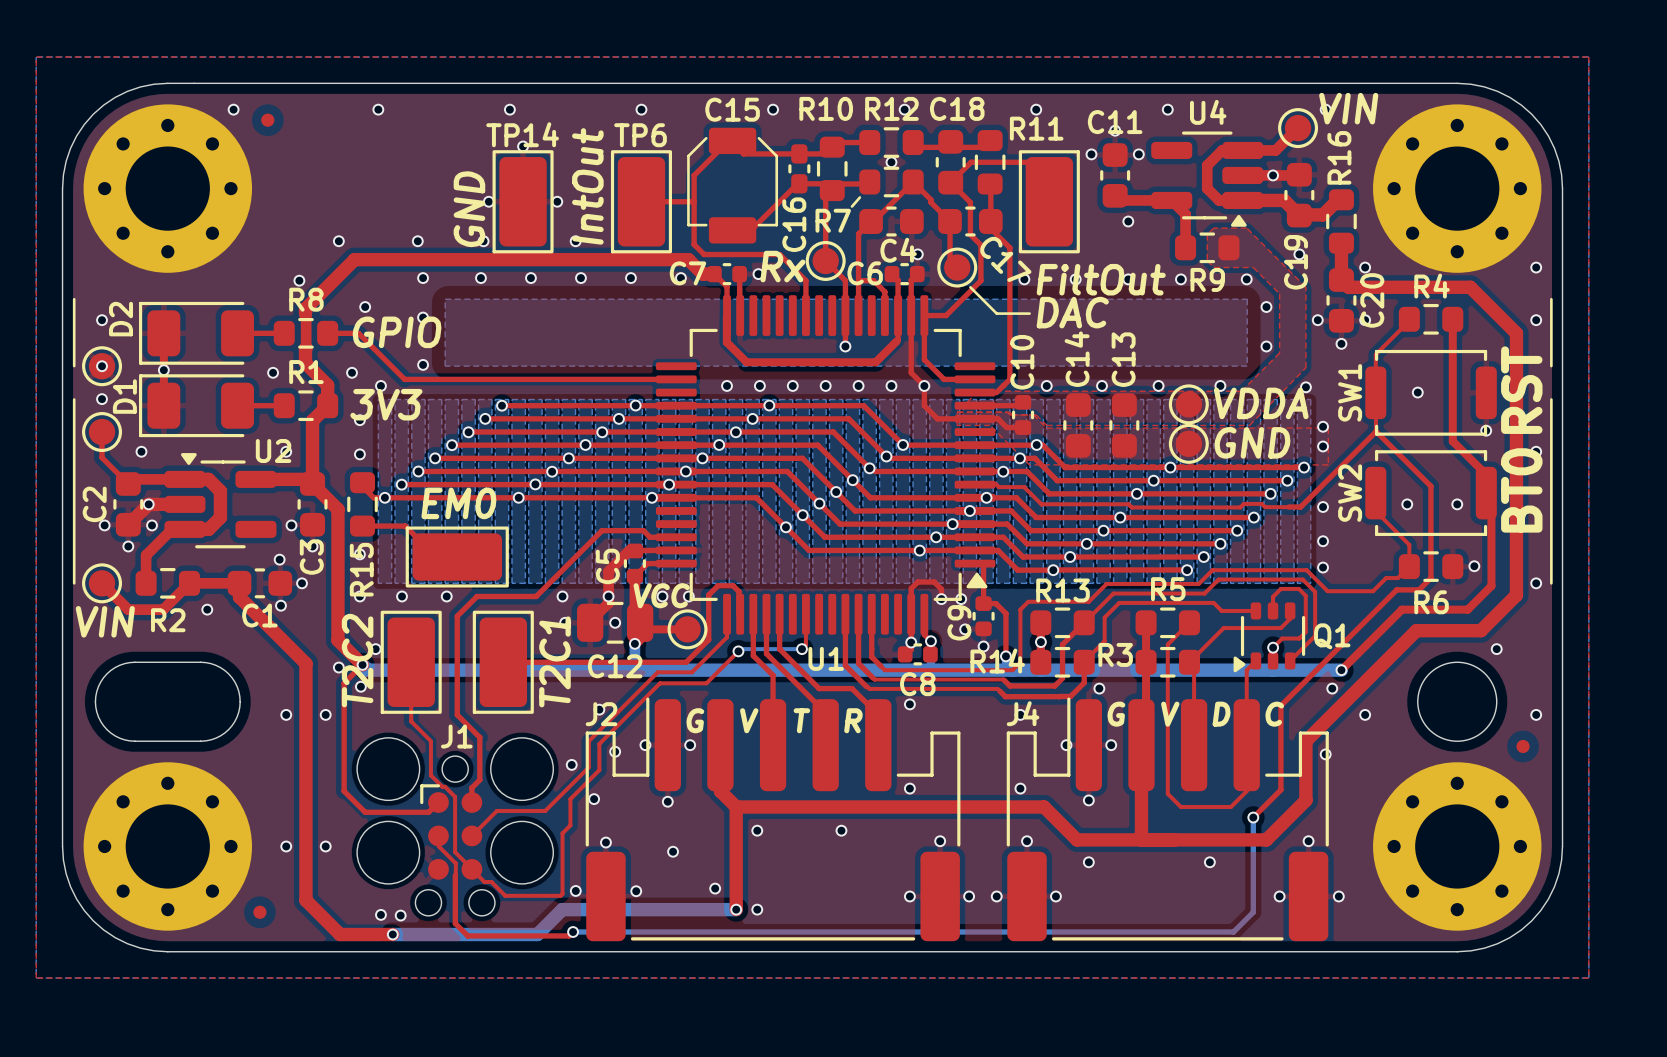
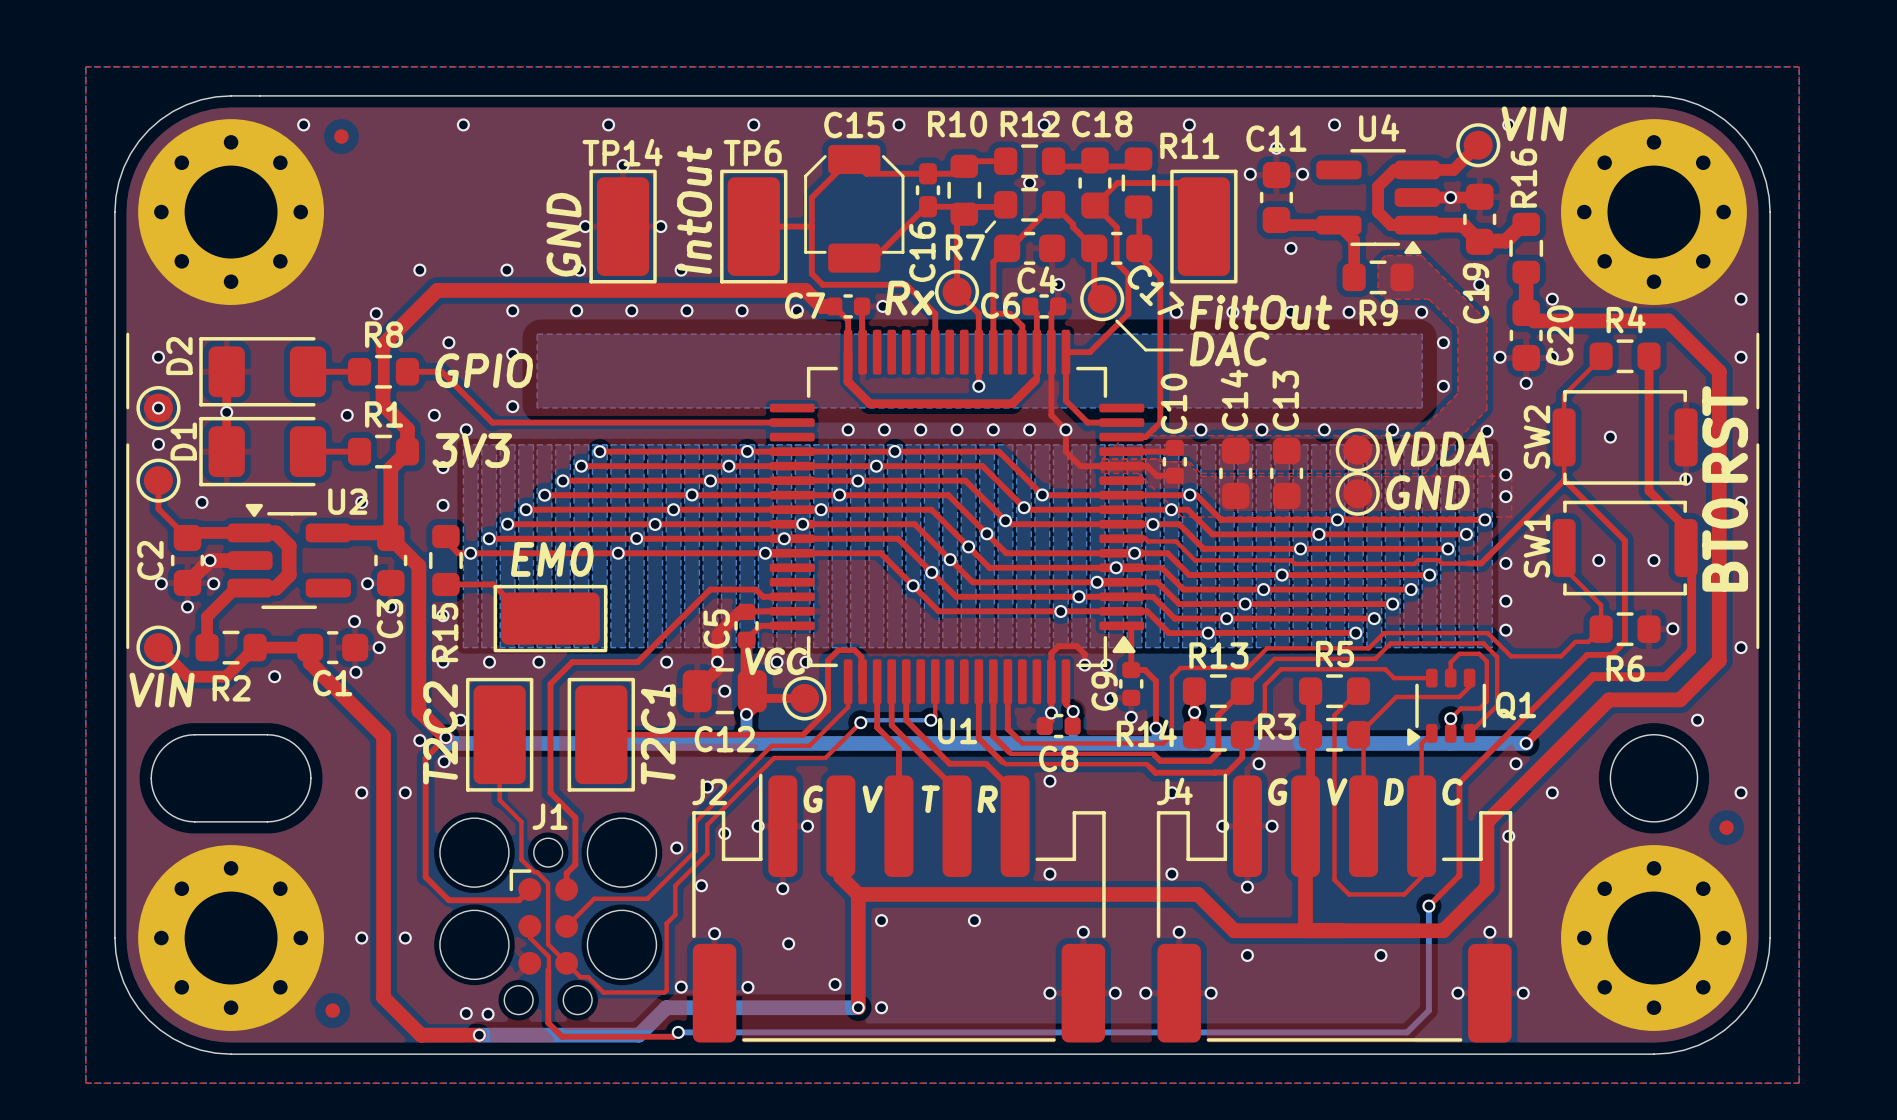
SW1 name position: SW1 (1350, 392) -> SW1 (1536, 545)
SW2 name position: SW2 (1350, 493) -> SW2 (1536, 437)

